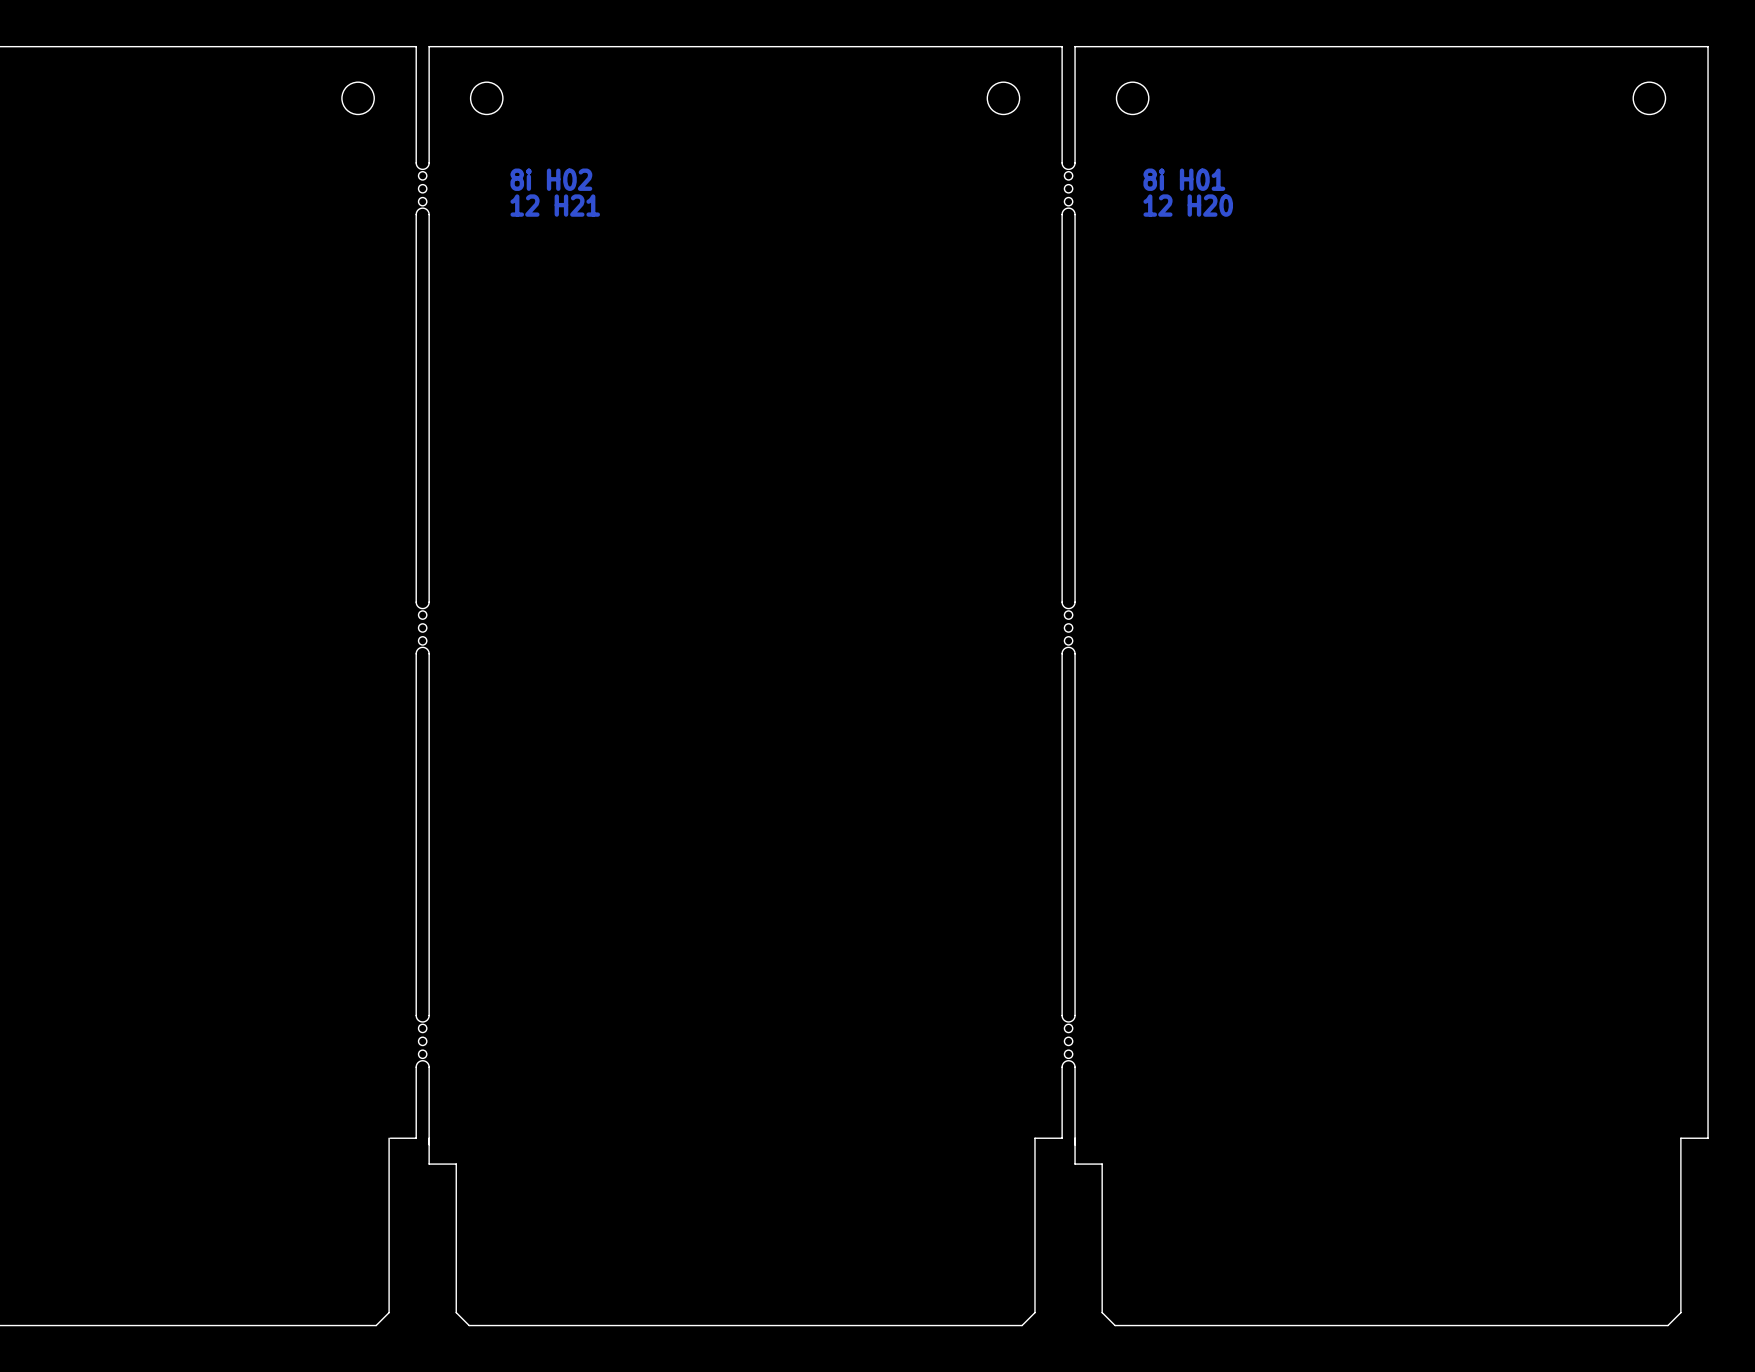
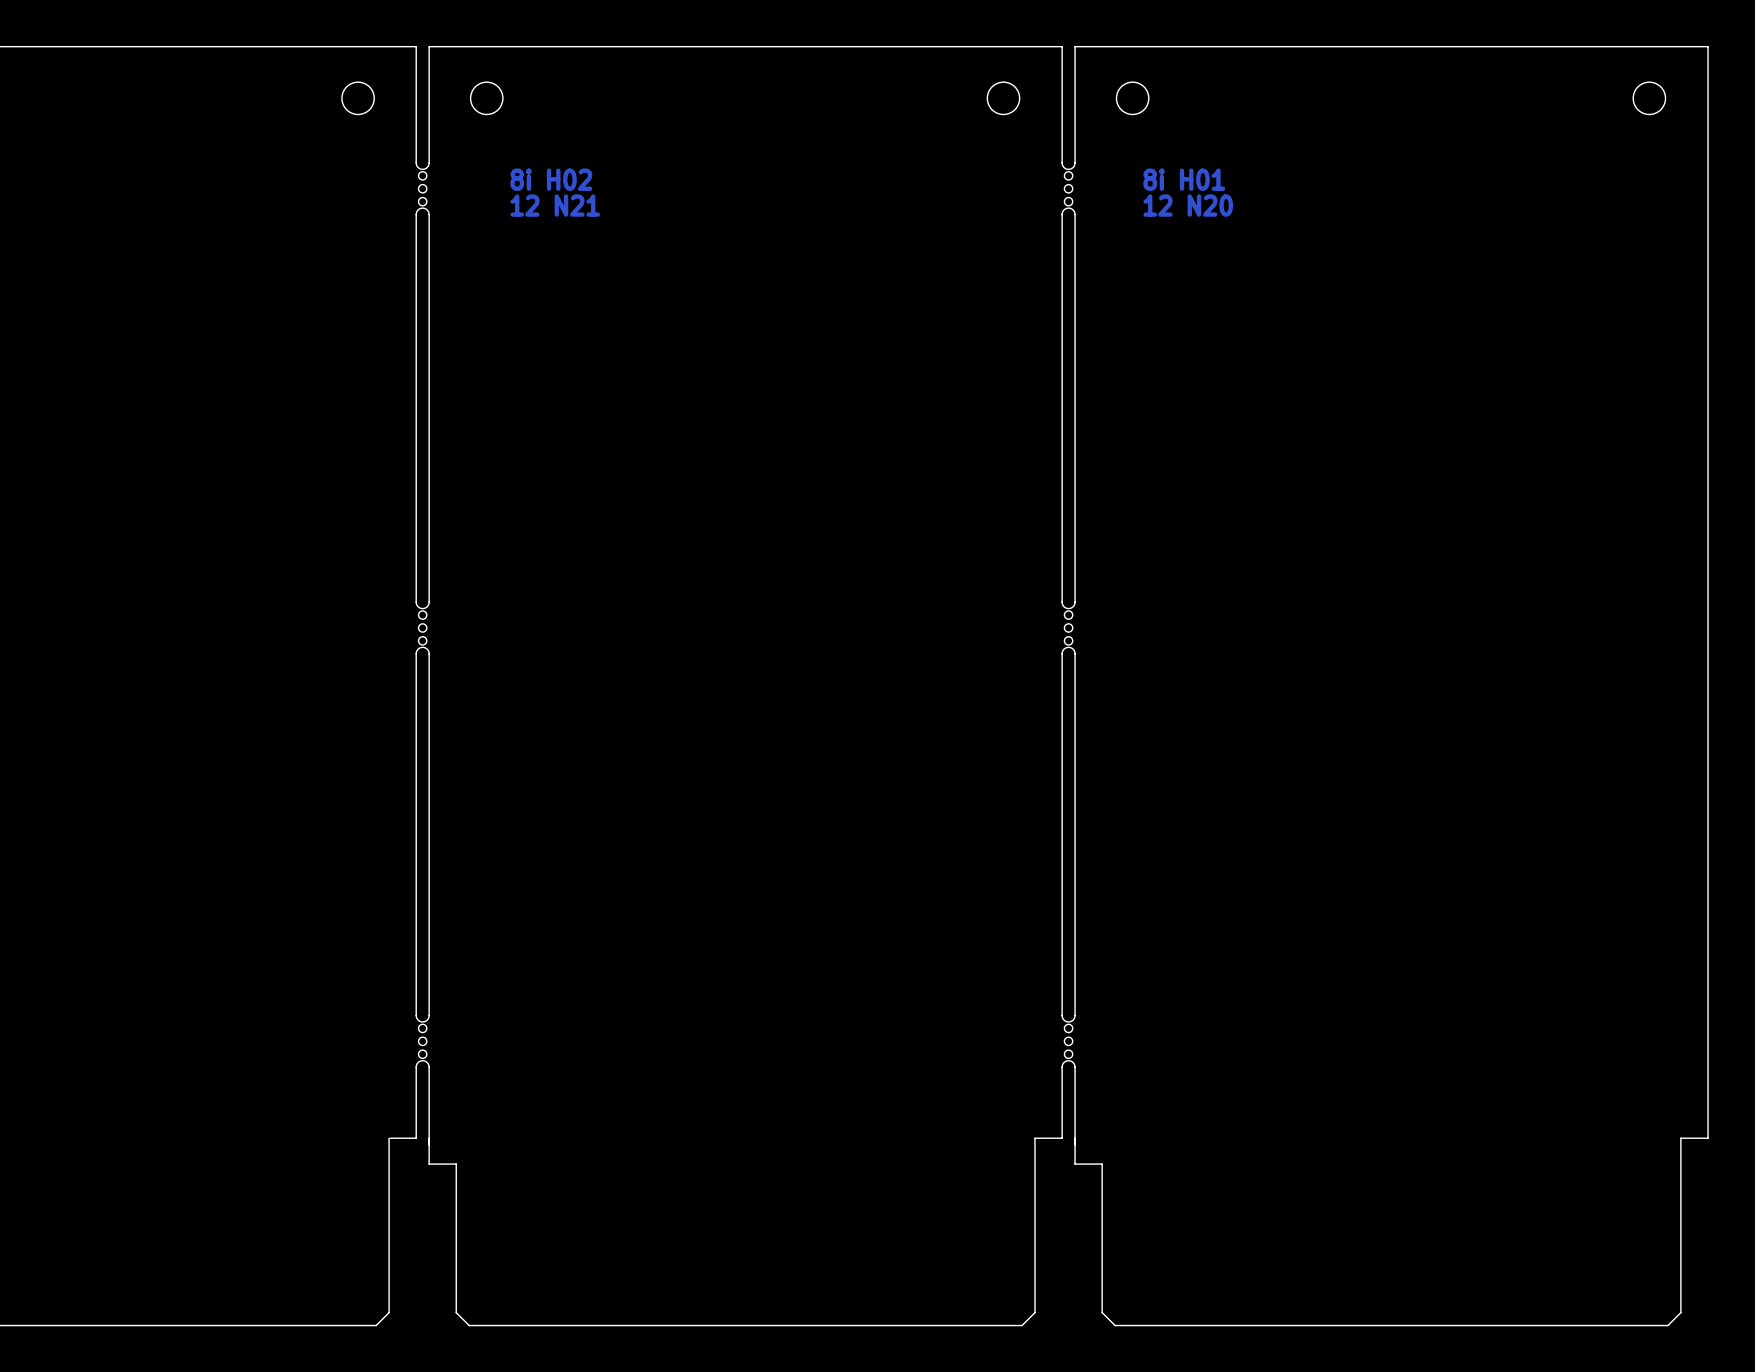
text: 12 H21 (555, 205) -> 12 N21 (555, 205)
text: 12 H20 (1188, 205) -> 12 N20 (1188, 205)

